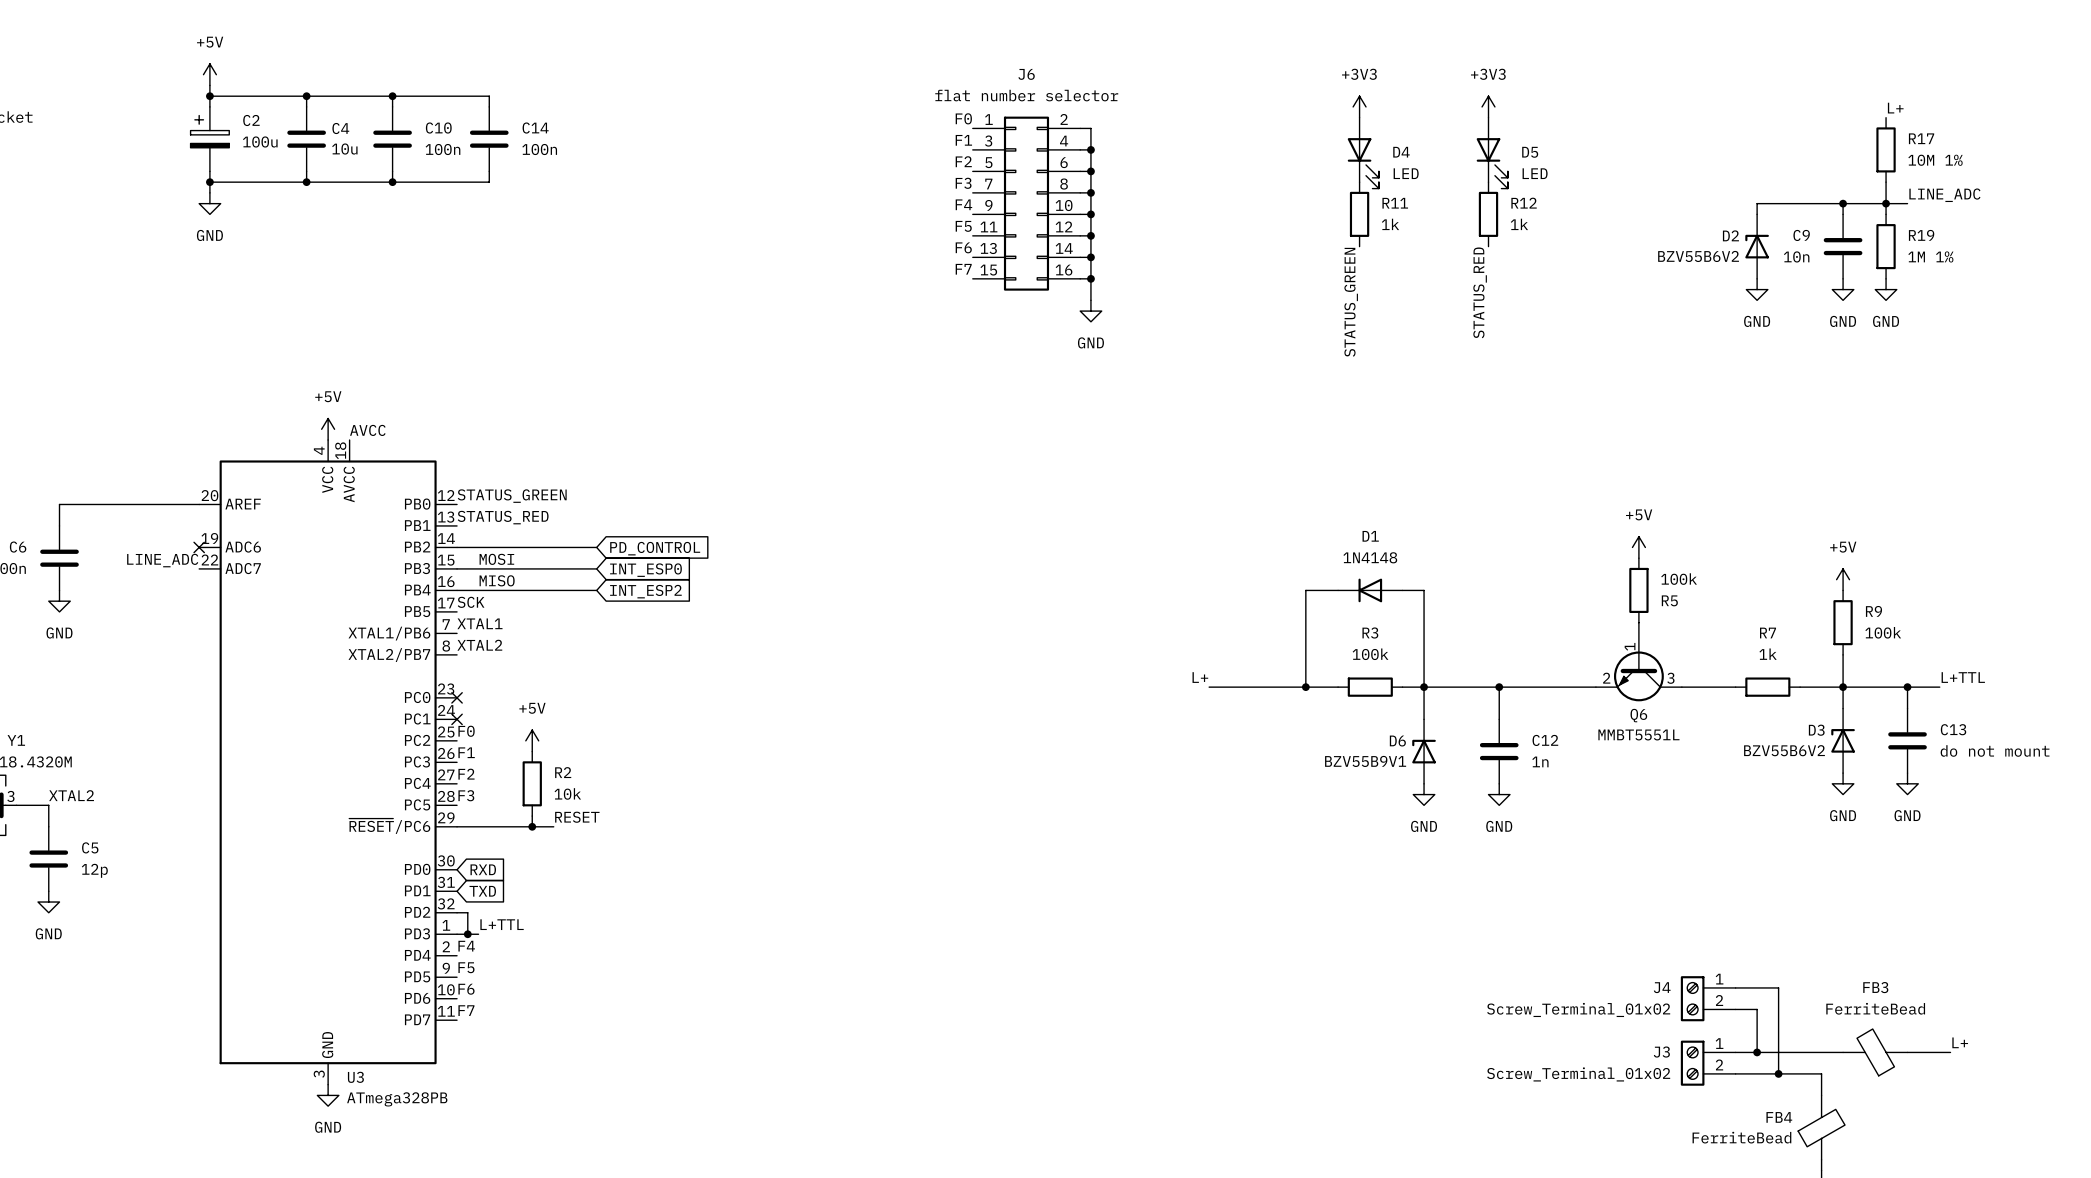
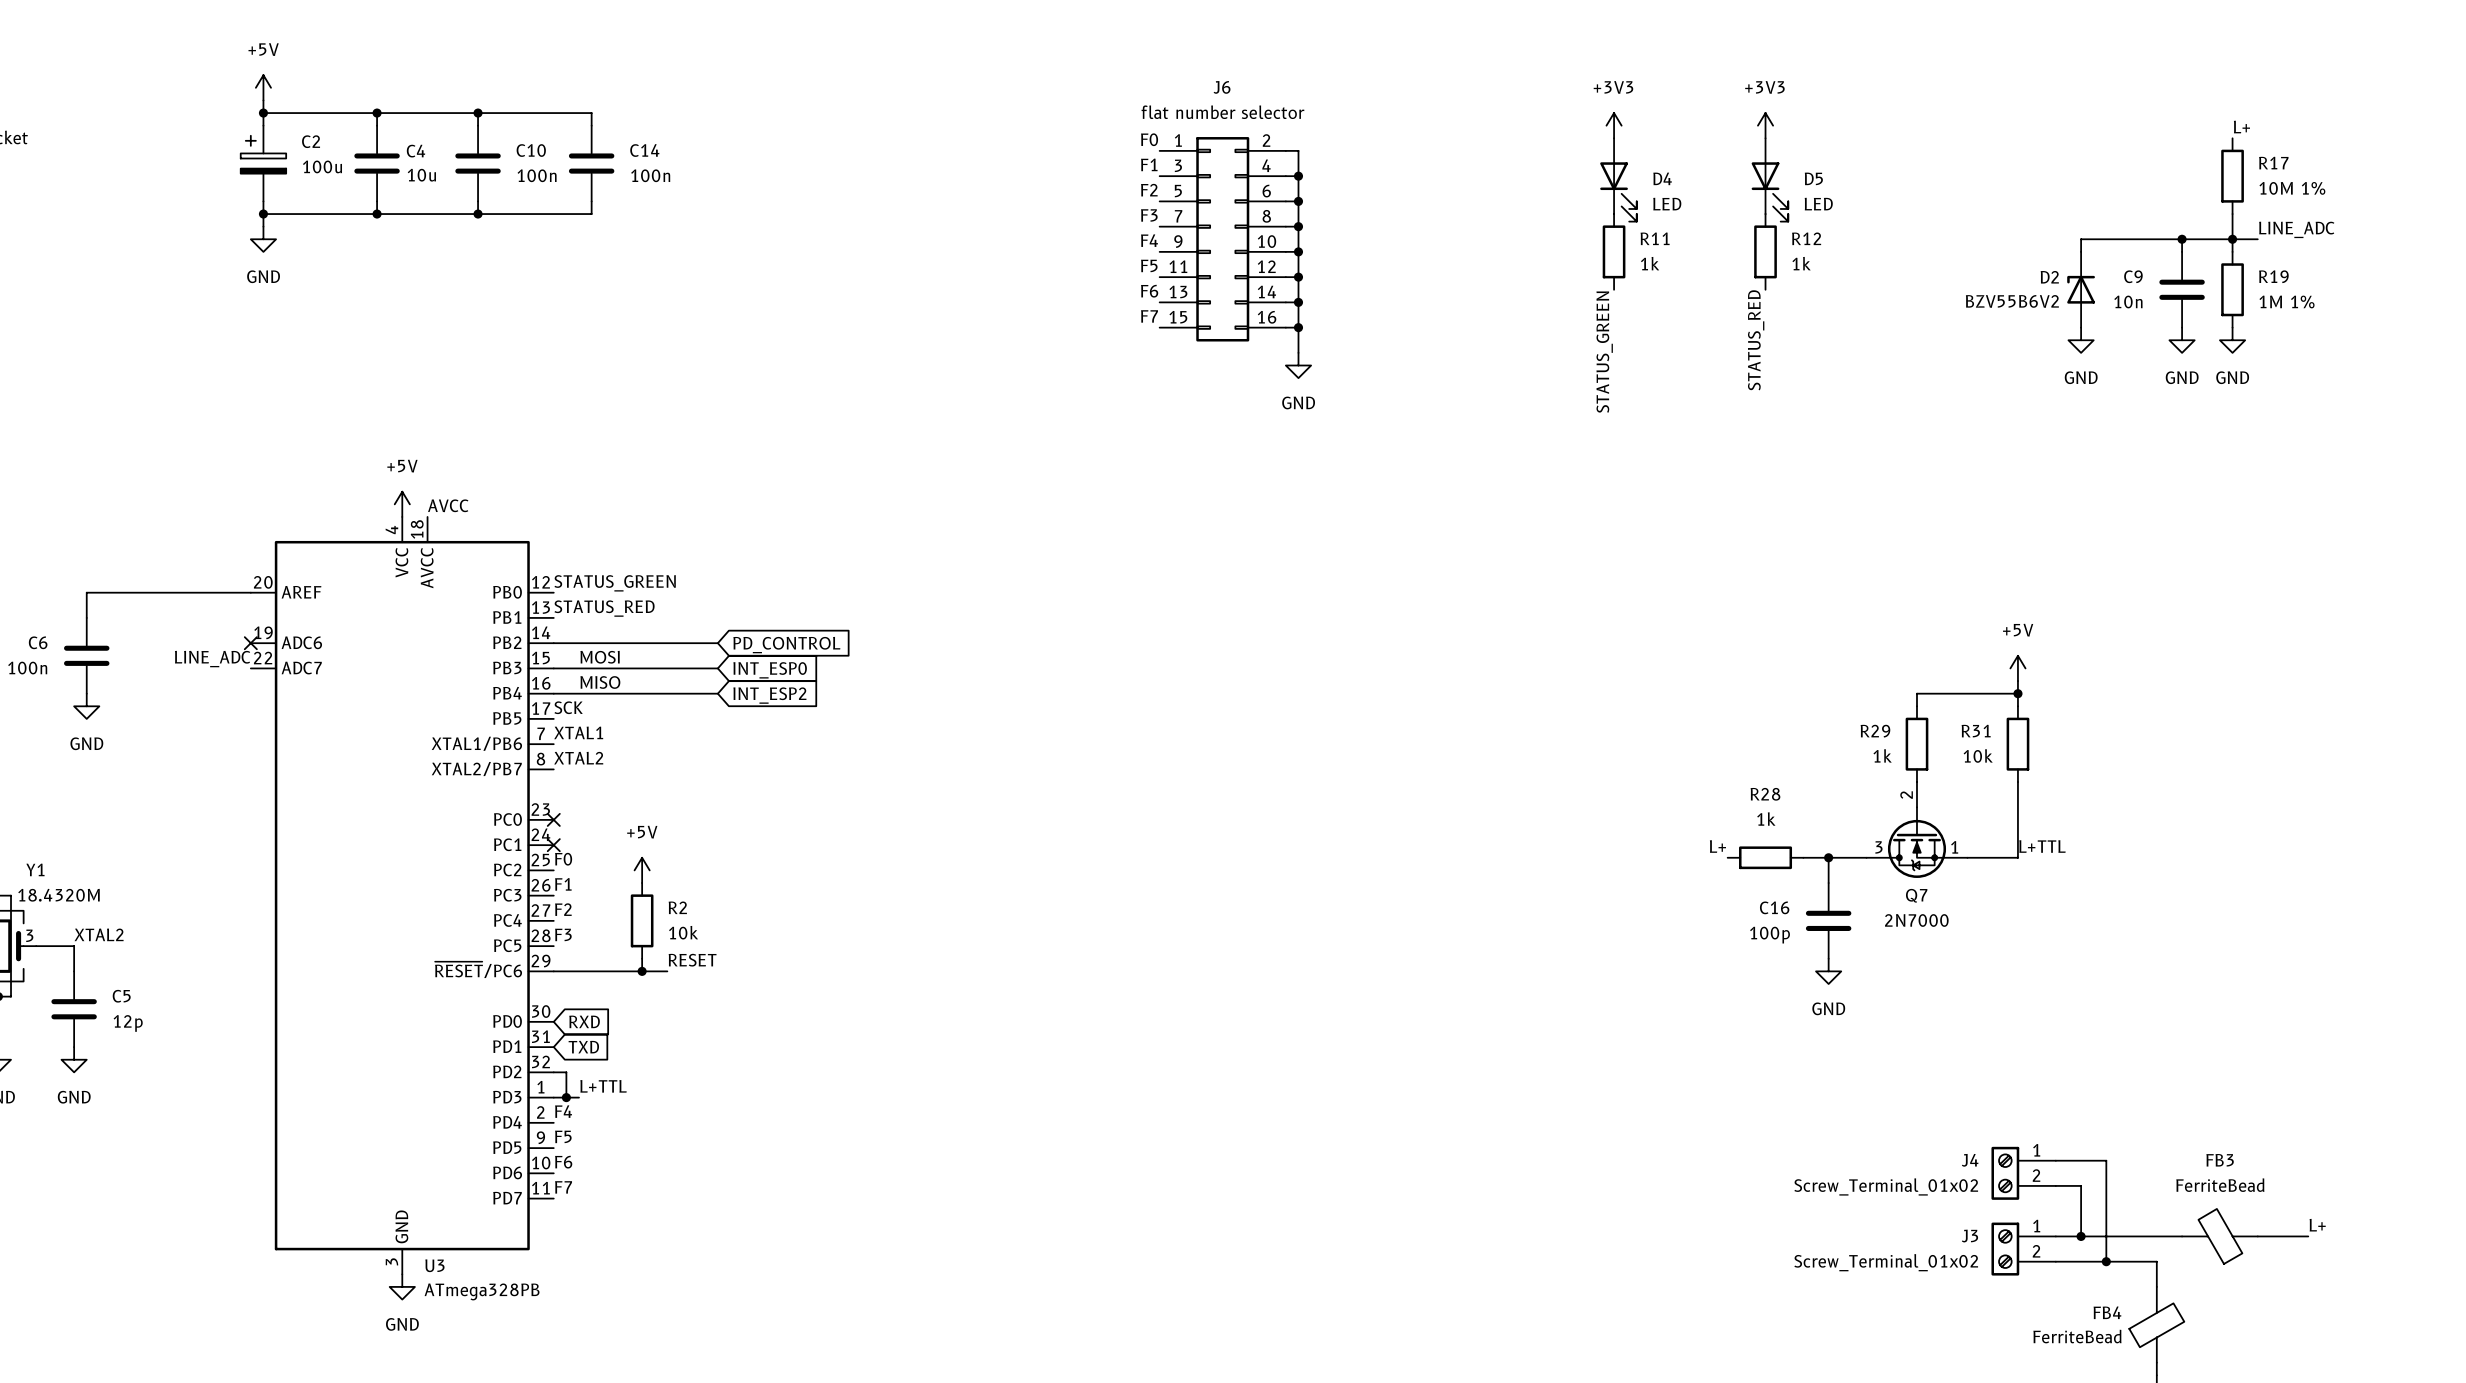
power symbol position: +5V (1638, 547) -> +5V (2017, 668)
wire: none -> (2017, 681) (2017, 706)
power symbol: +5V (1843, 579) -> none
wire: (1338, 590) (1305, 590) (1305, 687) -> none
D1: 1N4148 (1370, 590) -> none
wire: (1402, 590) (1424, 590) (1424, 719) -> none
R5: 100k (1638, 590) -> none
wire: none -> (2017, 693) (1916, 693) (1916, 706)
junction: none -> (2017, 693)
R9: 100k (1843, 622) -> none
R29: none -> 1k (1916, 744)
R31: none -> 10k (2017, 744)
wire: (1843, 654) (1843, 708) -> none
Q6: MMBT5551L (1638, 661) -> none
wire: none -> (2017, 782) (2017, 857) (1967, 857)
label: L+ (1200, 677) -> none
label: L+TTL (1963, 677) -> none
wire: (1209, 687) (1338, 687) -> none
junction: (1305, 687) -> none
R3: 100k (1370, 687) -> none
wire: (1402, 687) (1595, 687) -> none
junction: (1424, 687) -> none
wire: (1499, 687) (1499, 719) -> none
junction: (1499, 687) -> none
wire: (1681, 687) (1735, 687) -> (1803, 857) (1866, 857)
R7: 1k (1767, 687) -> none
wire: (1800, 687) (1939, 687) -> none
junction: (1843, 687) -> none
wire: (1907, 687) (1907, 708) -> none
junction: (1907, 687) -> none
Q7: none -> 2N7000 (1916, 830)
label: none -> L+ (1717, 846)
label: none -> L+TTL (2042, 846)
R28: none -> 1k (1765, 857)
wire: none -> (1828, 857) (1828, 883)
junction: none -> (1828, 857)
D3: BZV55B6V2 (1843, 740) -> none
C13: do not mount (1907, 740) -> none
D6: BZV55B9V1 (1424, 751) -> none
C12: 1n (1499, 751) -> none
C16: none -> 100p (1828, 920)
power symbol: GND (1843, 783) -> none
power symbol: GND (1907, 783) -> none
power symbol: GND (1424, 794) -> none
power symbol position: GND (1499, 794) -> GND (1828, 971)

